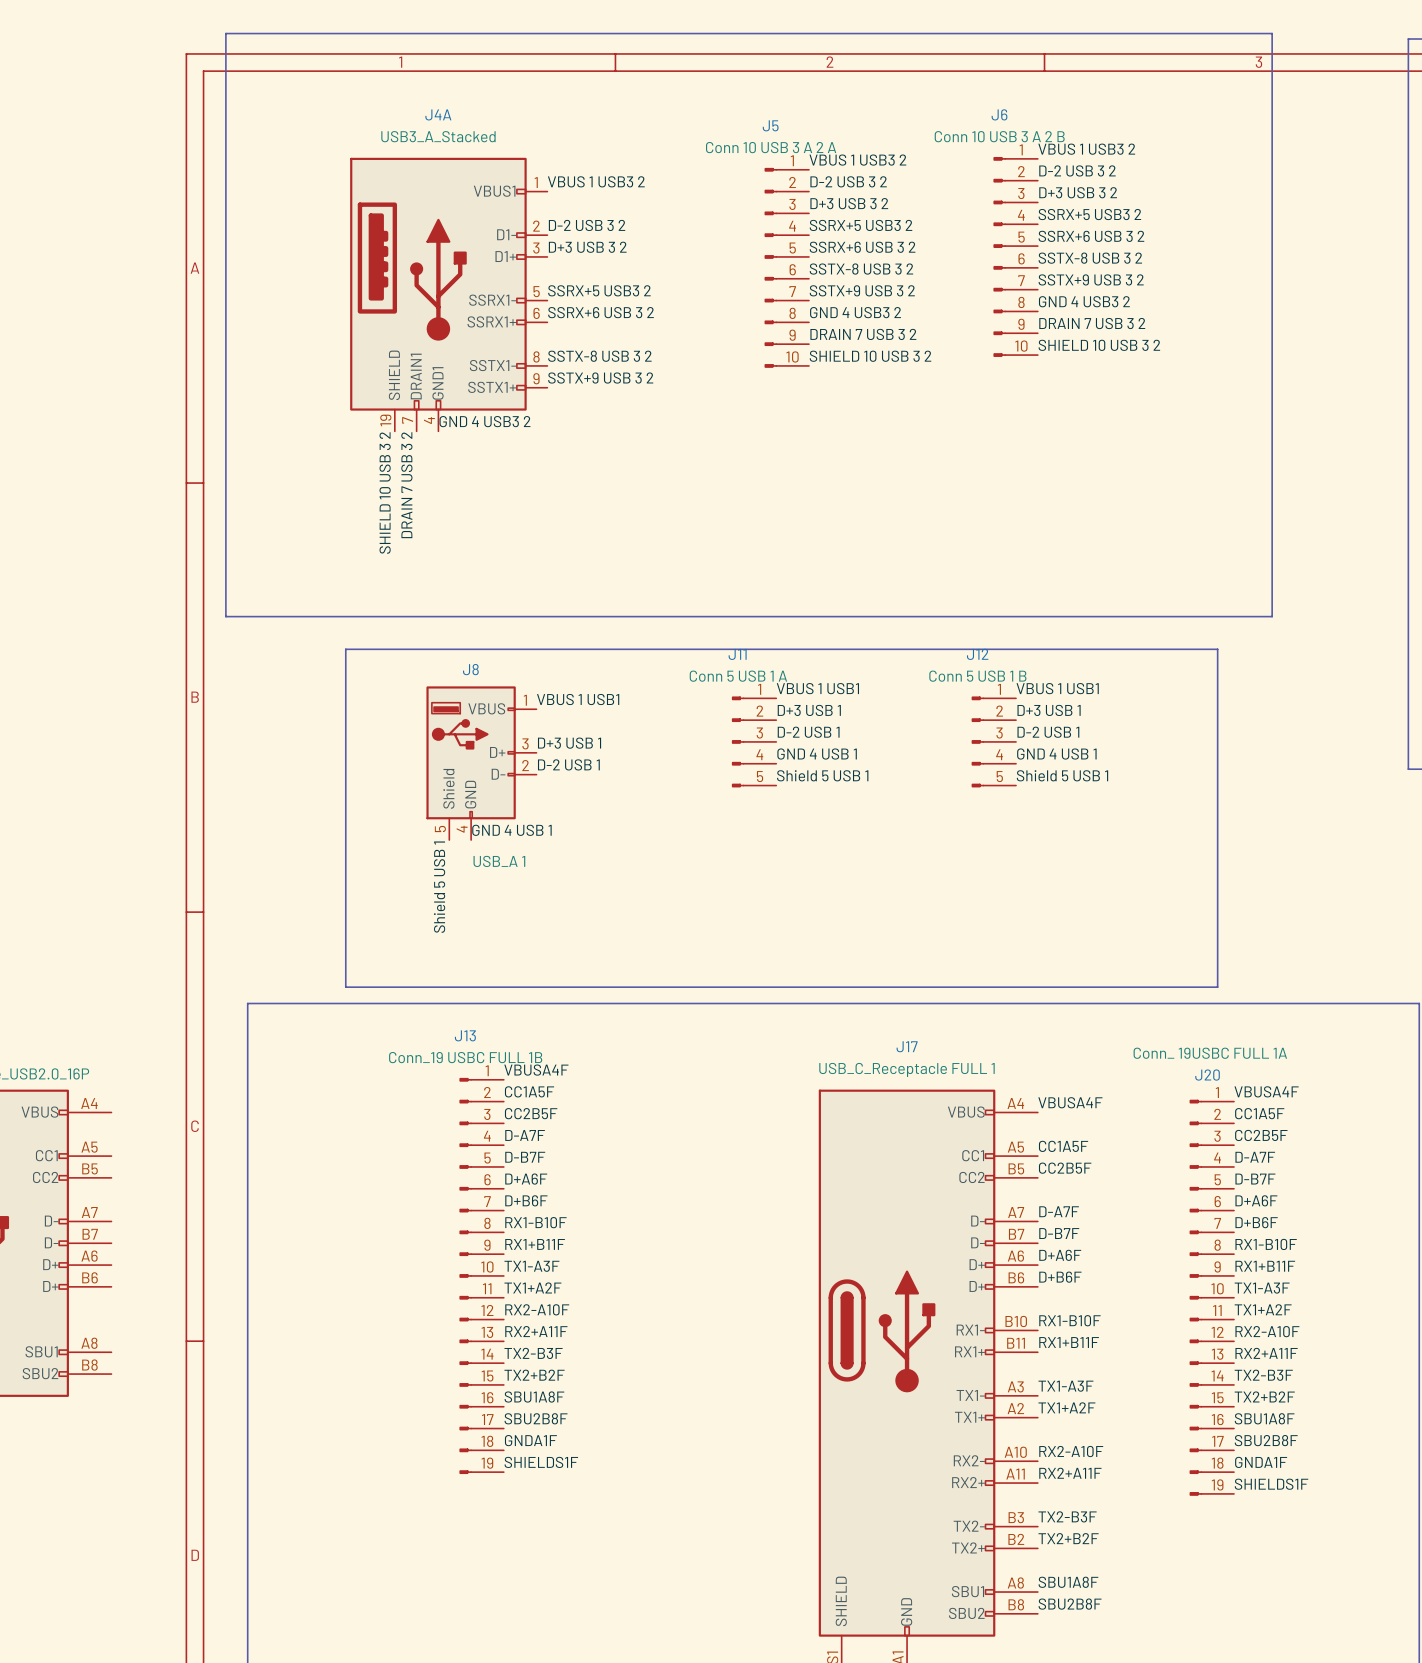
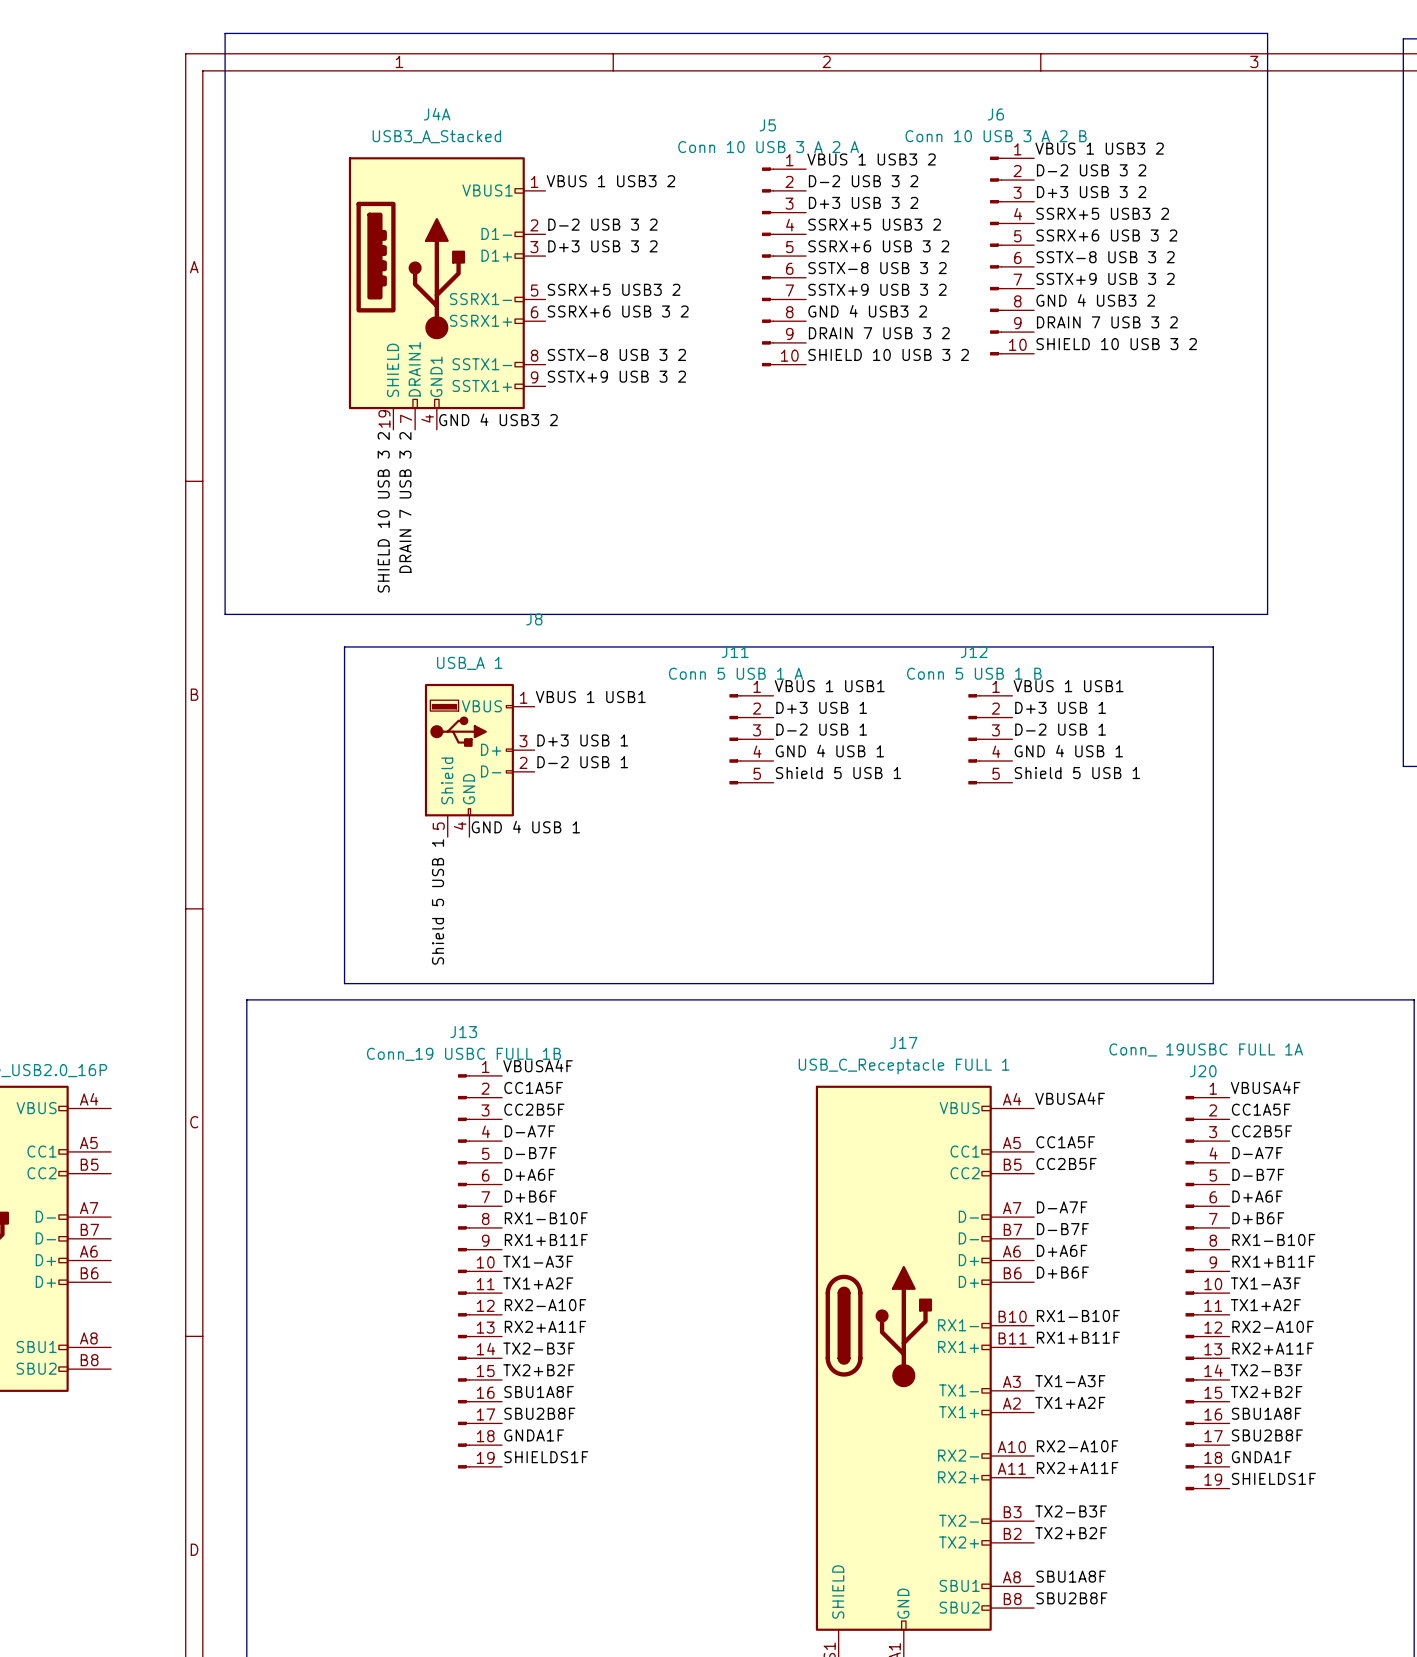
J8 name position: J8 (470, 669) -> J8 (534, 619)
J8 value position: USB_A 1 (499, 861) -> USB_A 1 (469, 663)

